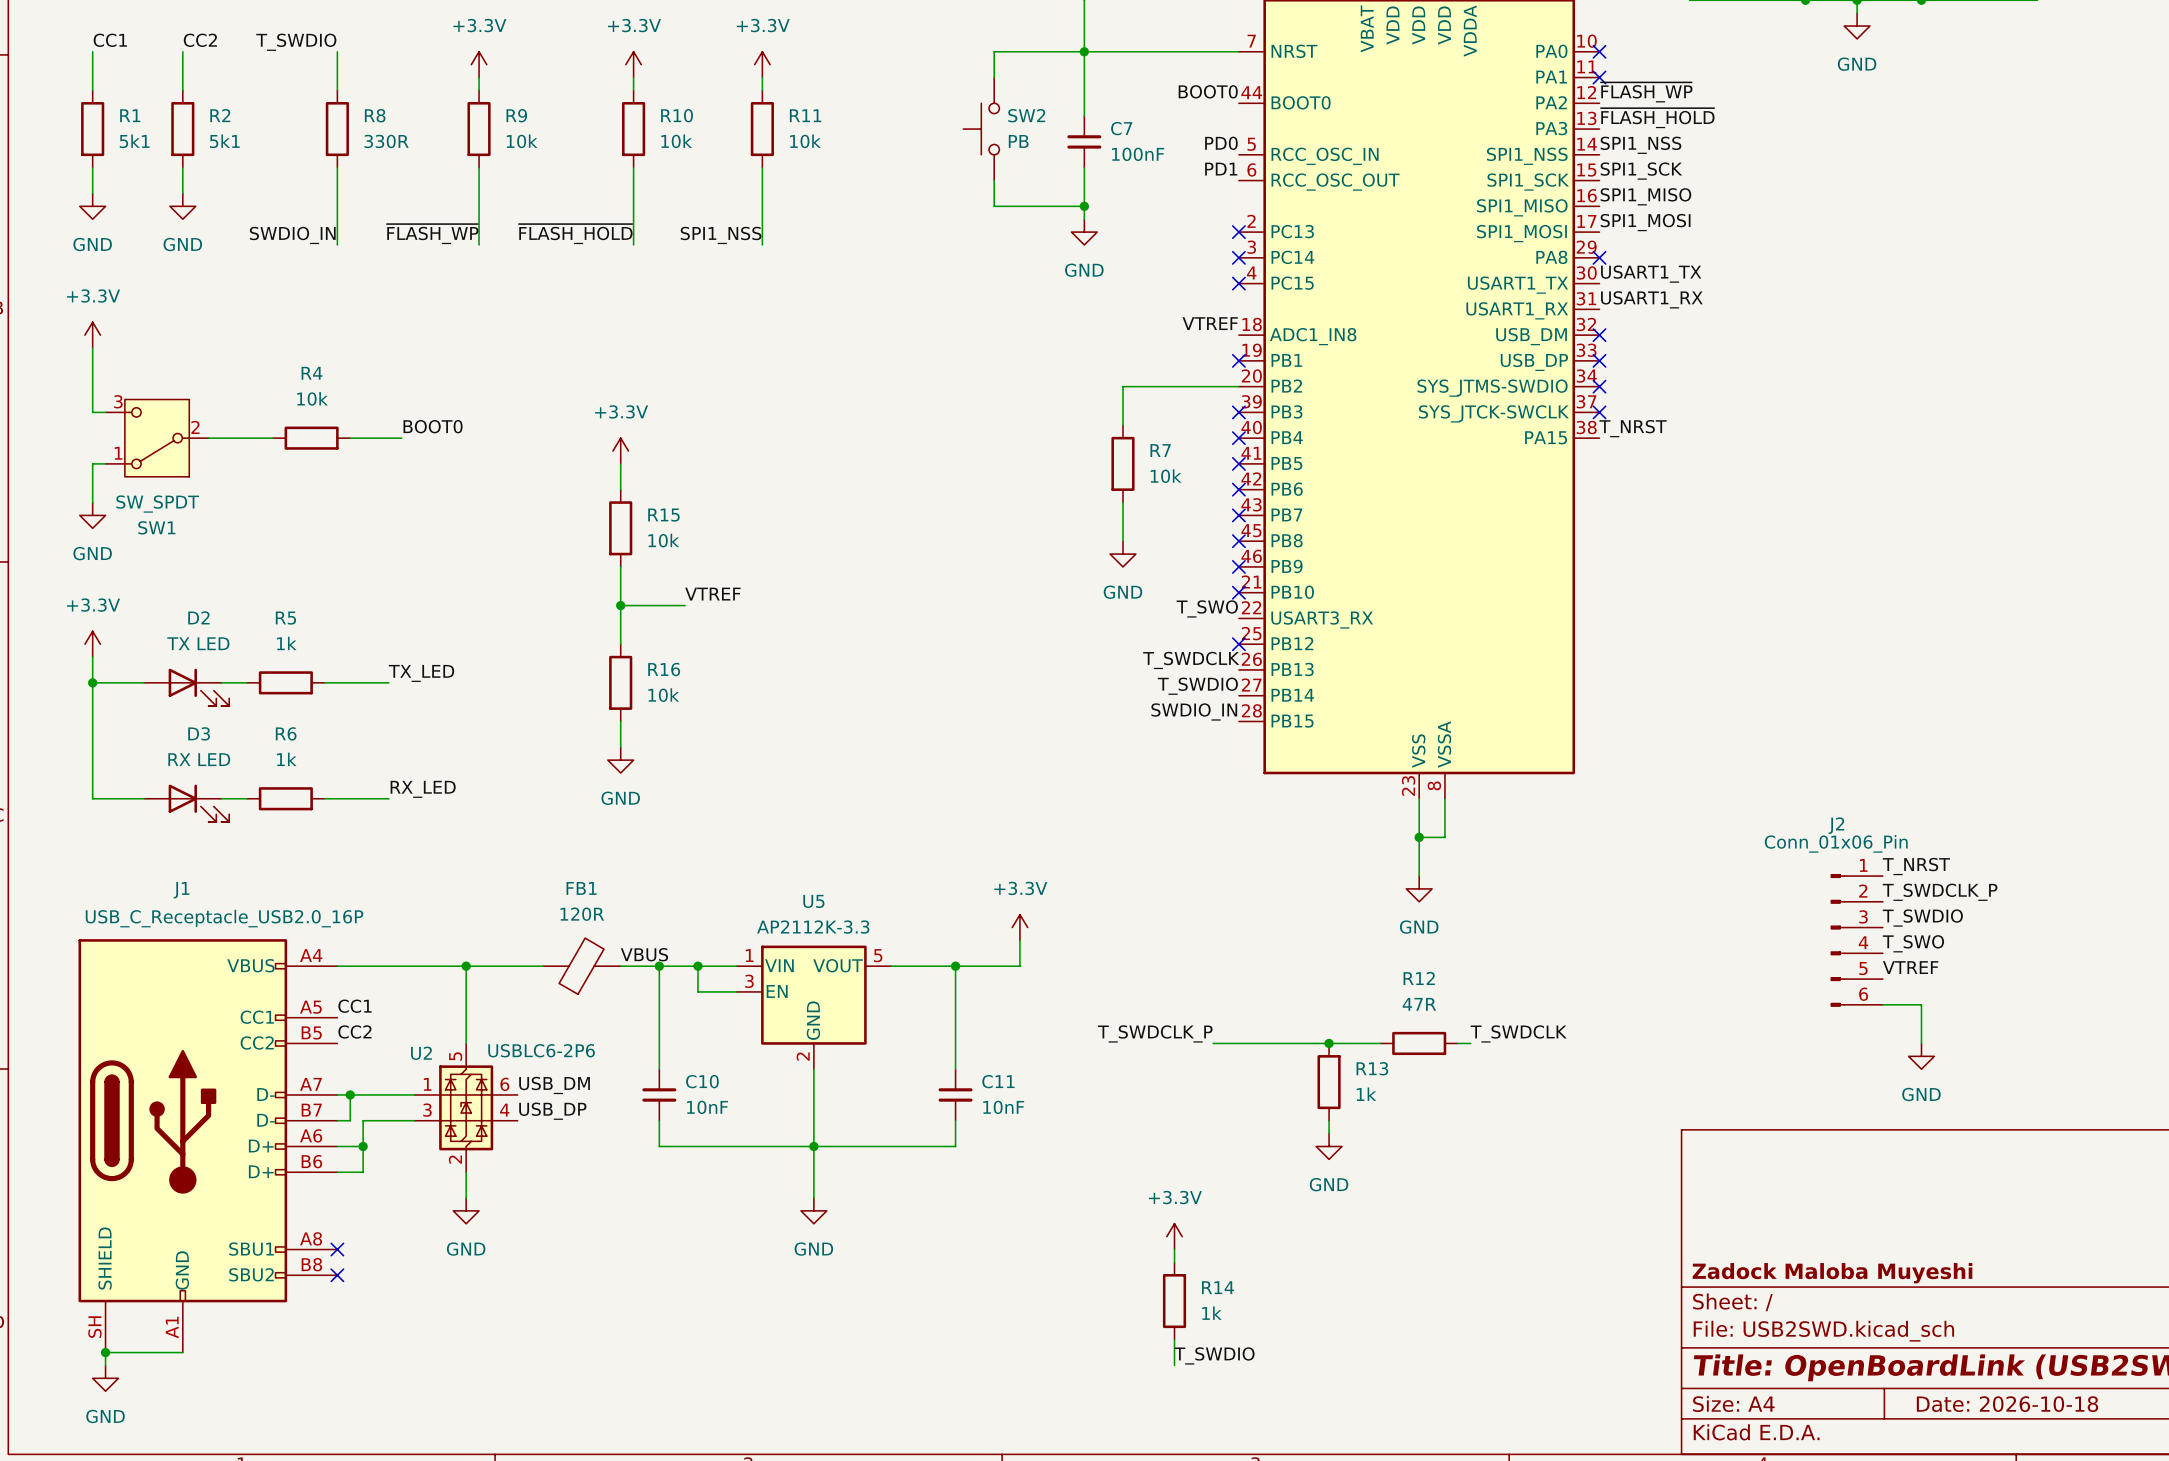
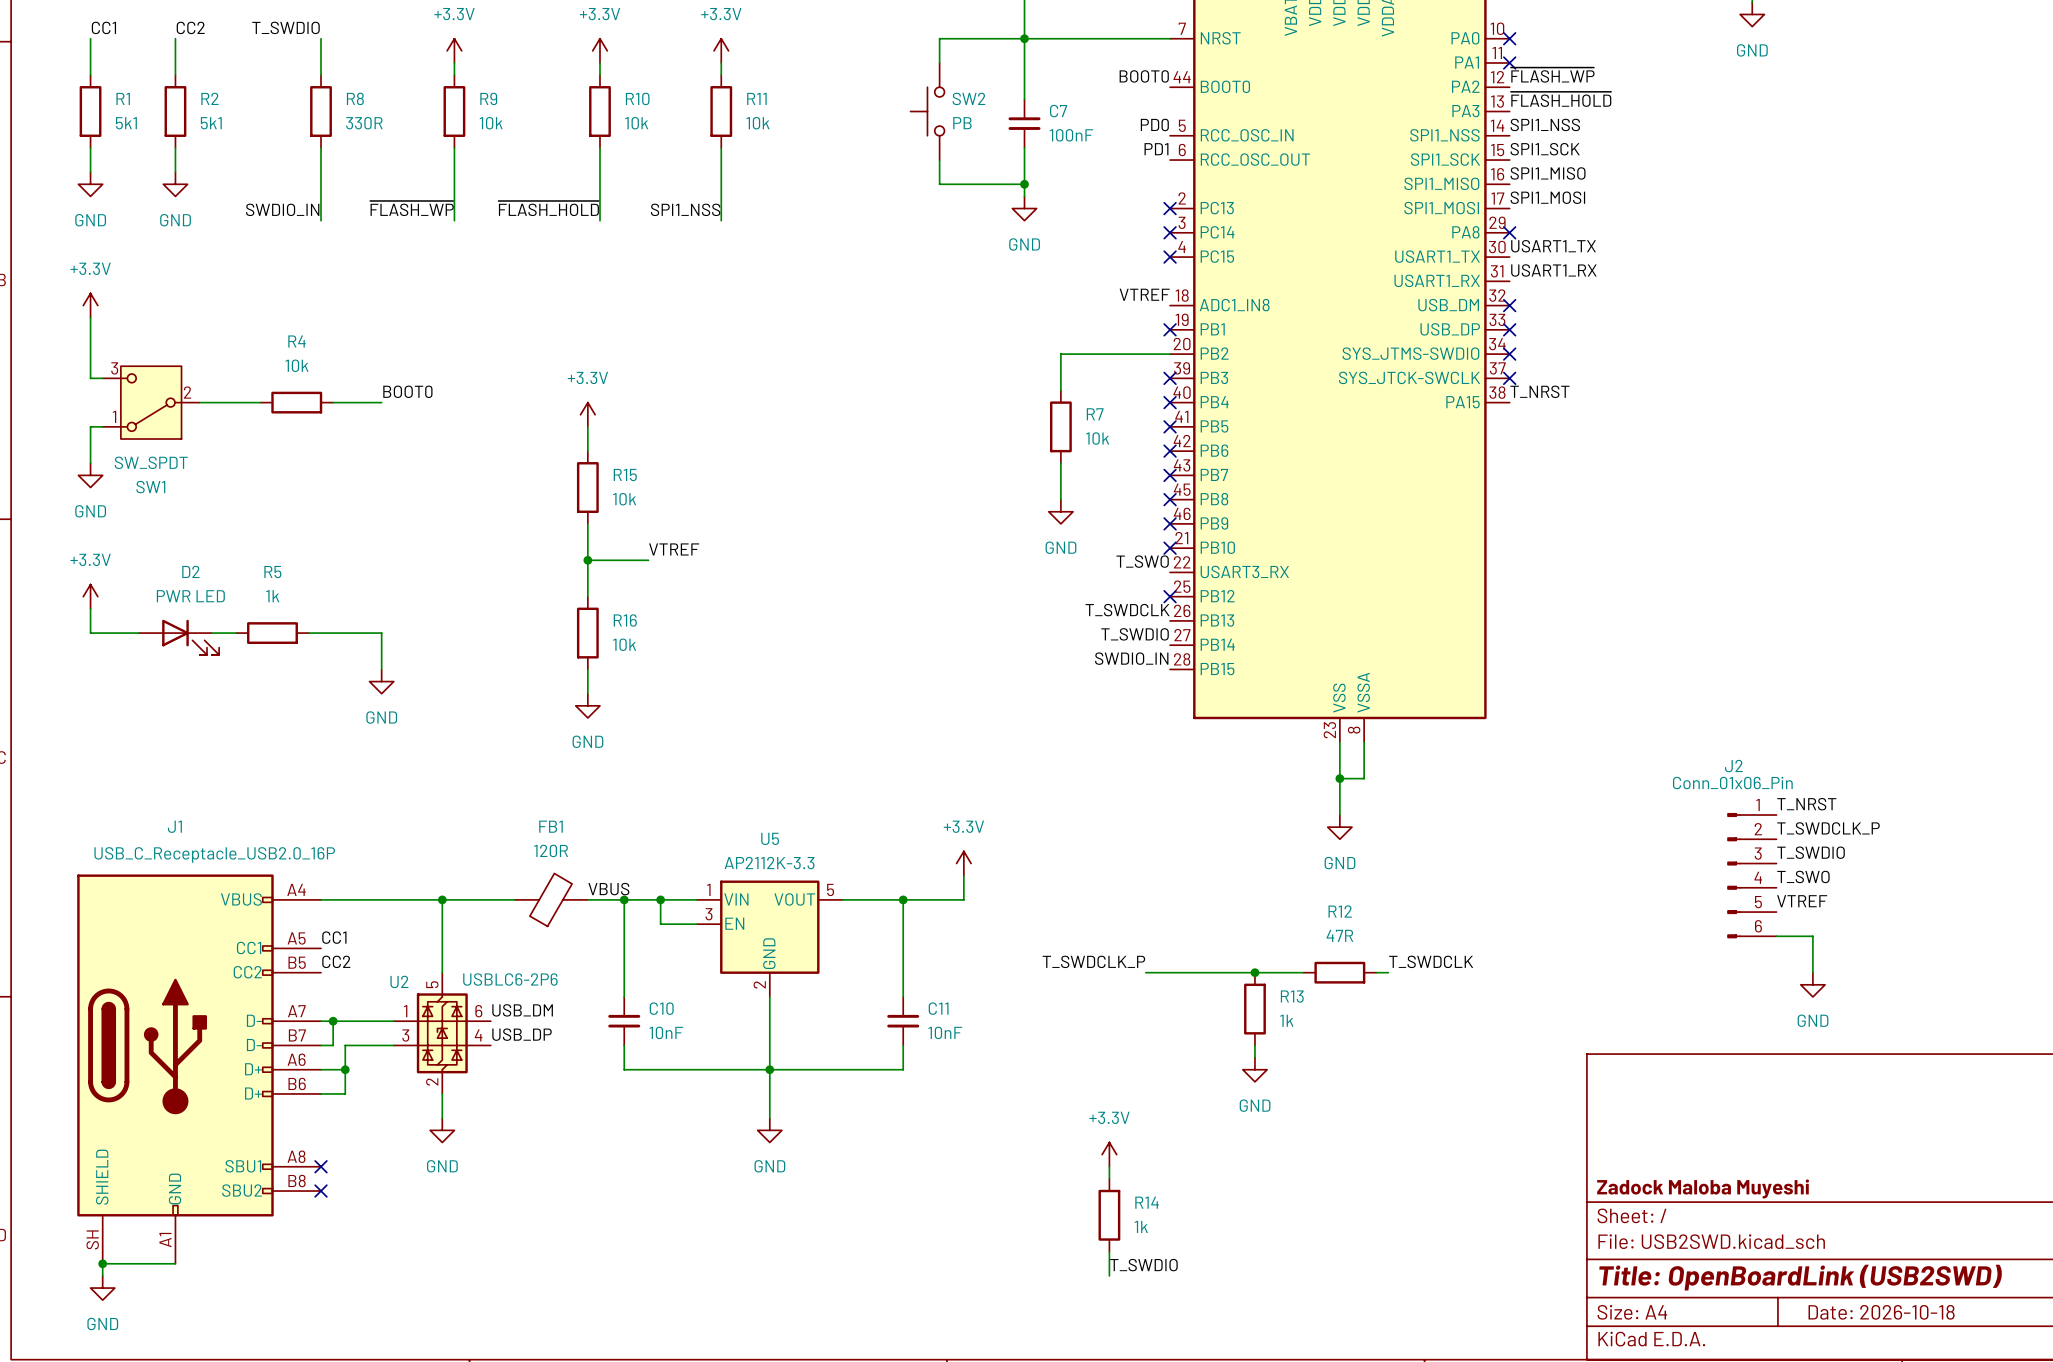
D2 value: TX LED (198, 643) -> PWR LED (190, 596)
label: TX_LED (421, 673) -> none
wire: (92, 682) (92, 798) (144, 798) -> none
junction: (92, 682) -> none
wire: none -> (369, 633) (381, 633) (381, 669)
power symbol: none -> GND (381, 681)
label: RX_LED (423, 789) -> none
wire: (221, 798) (247, 798) -> none
R6: 1k (285, 798) -> none
wire: (324, 798) (388, 798) -> none
D3: RX LED (186, 803) -> none

